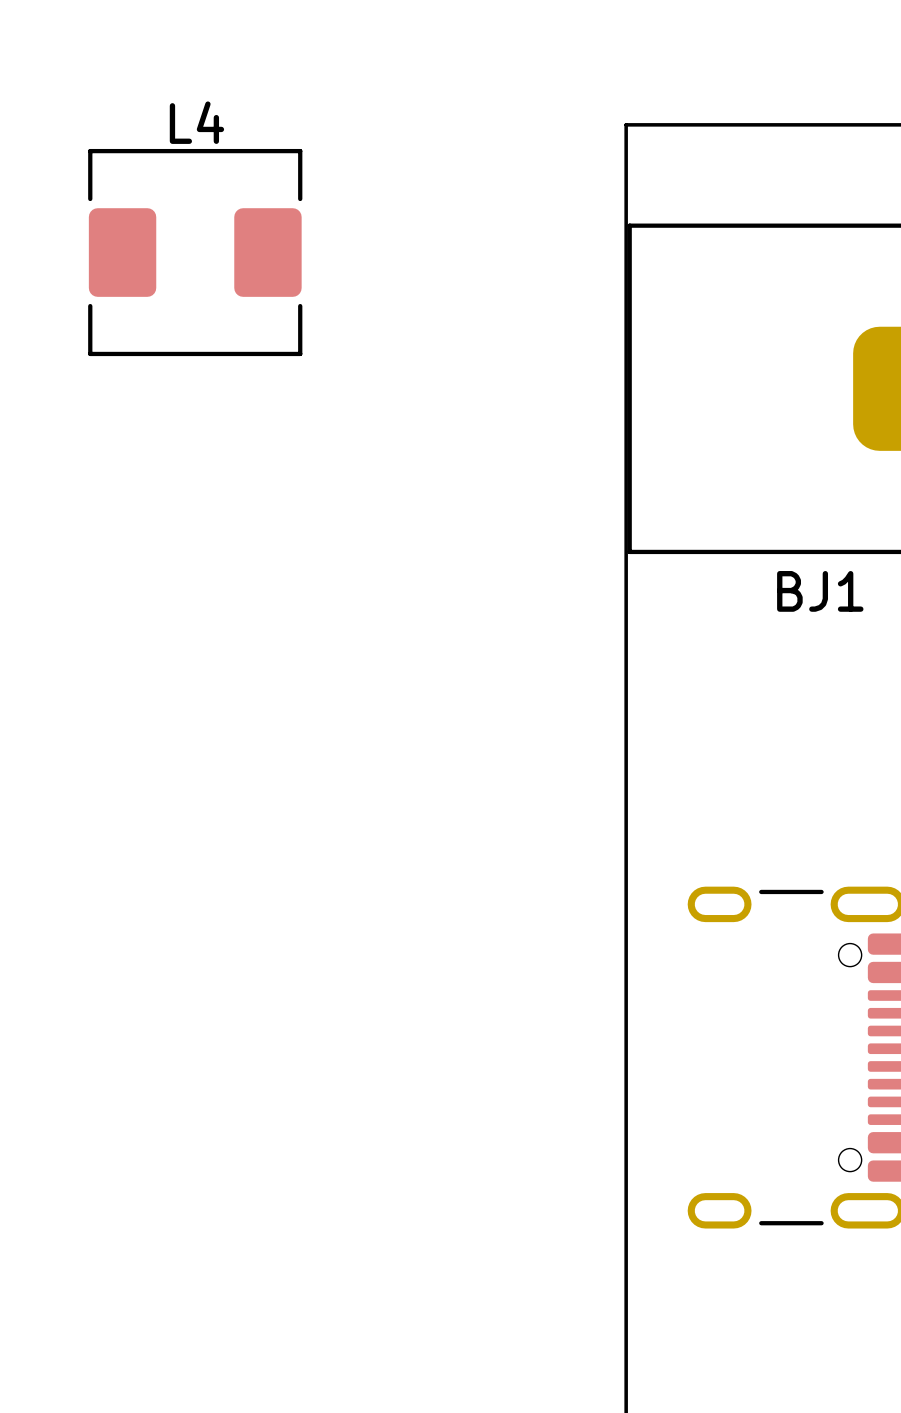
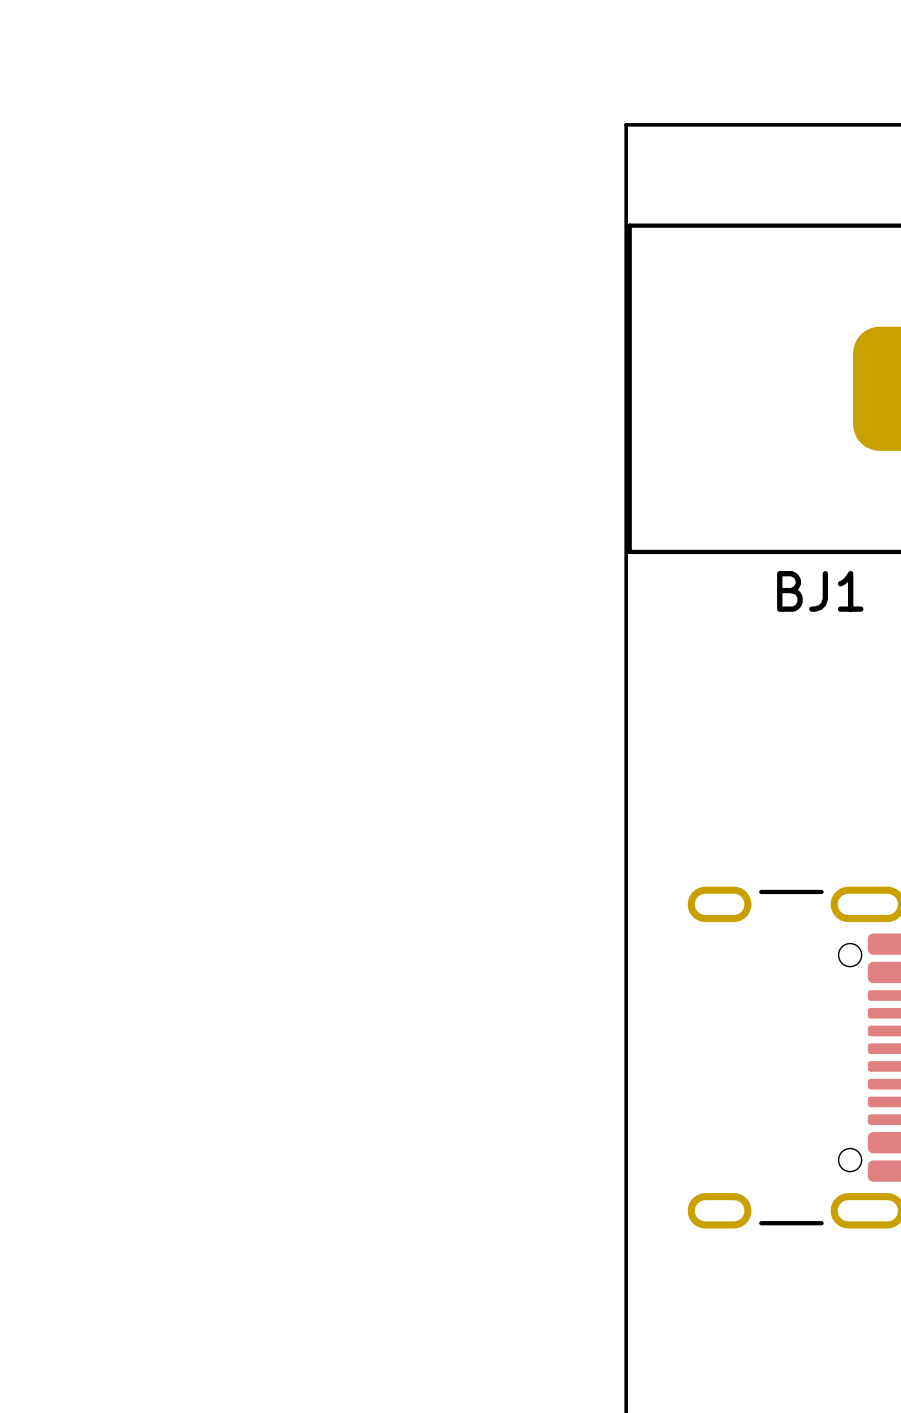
L4: (195, 252) -> none

